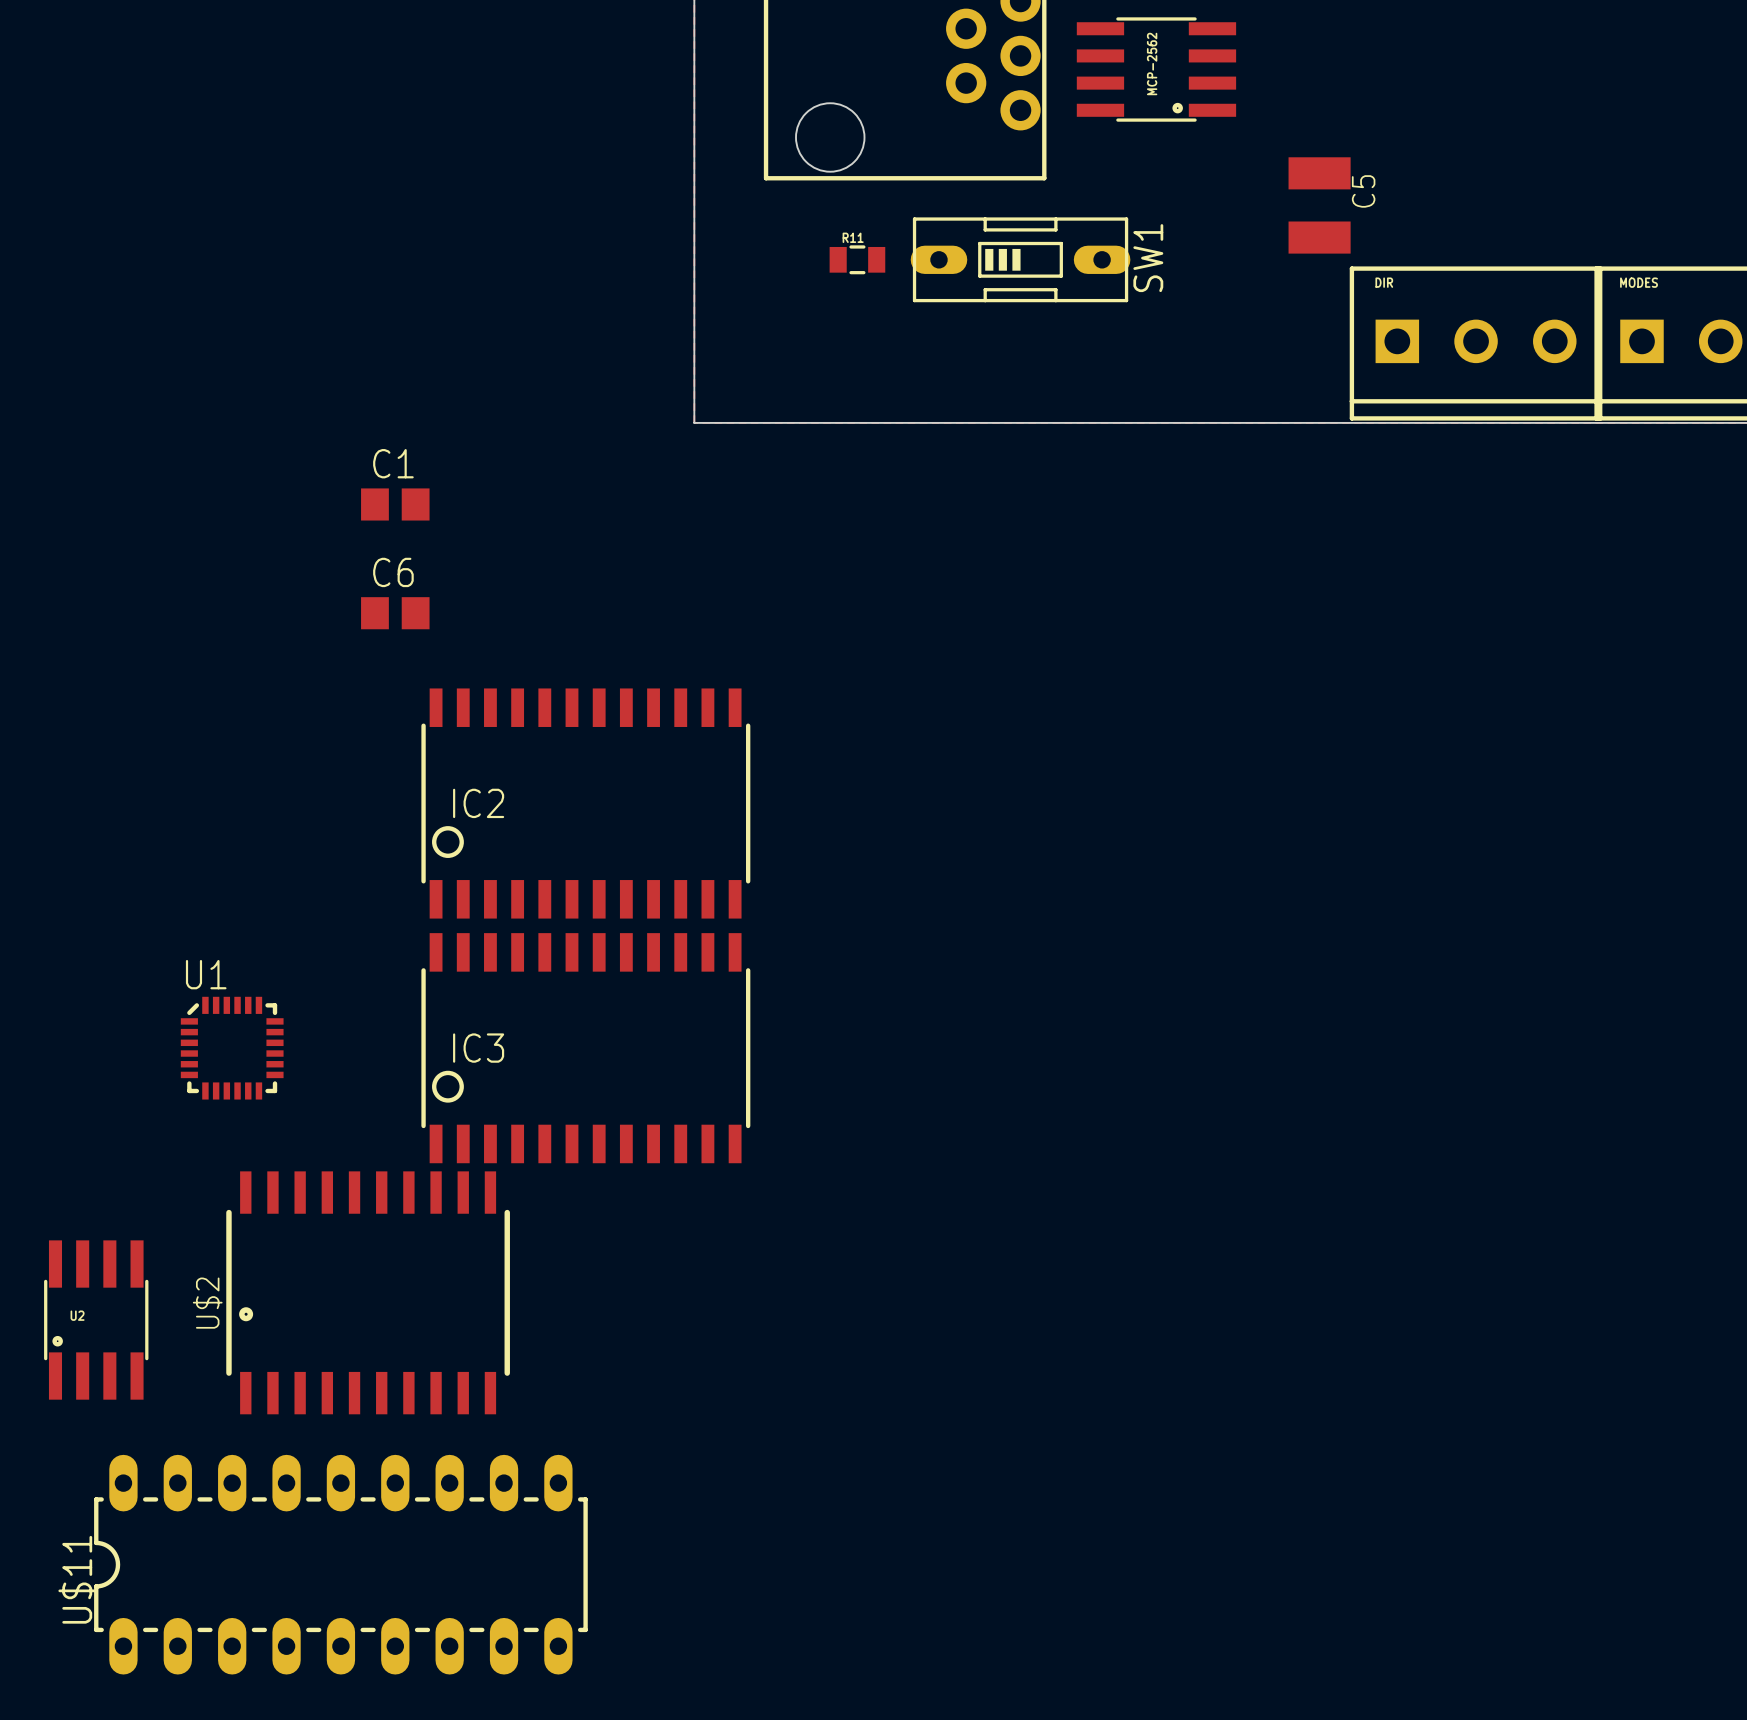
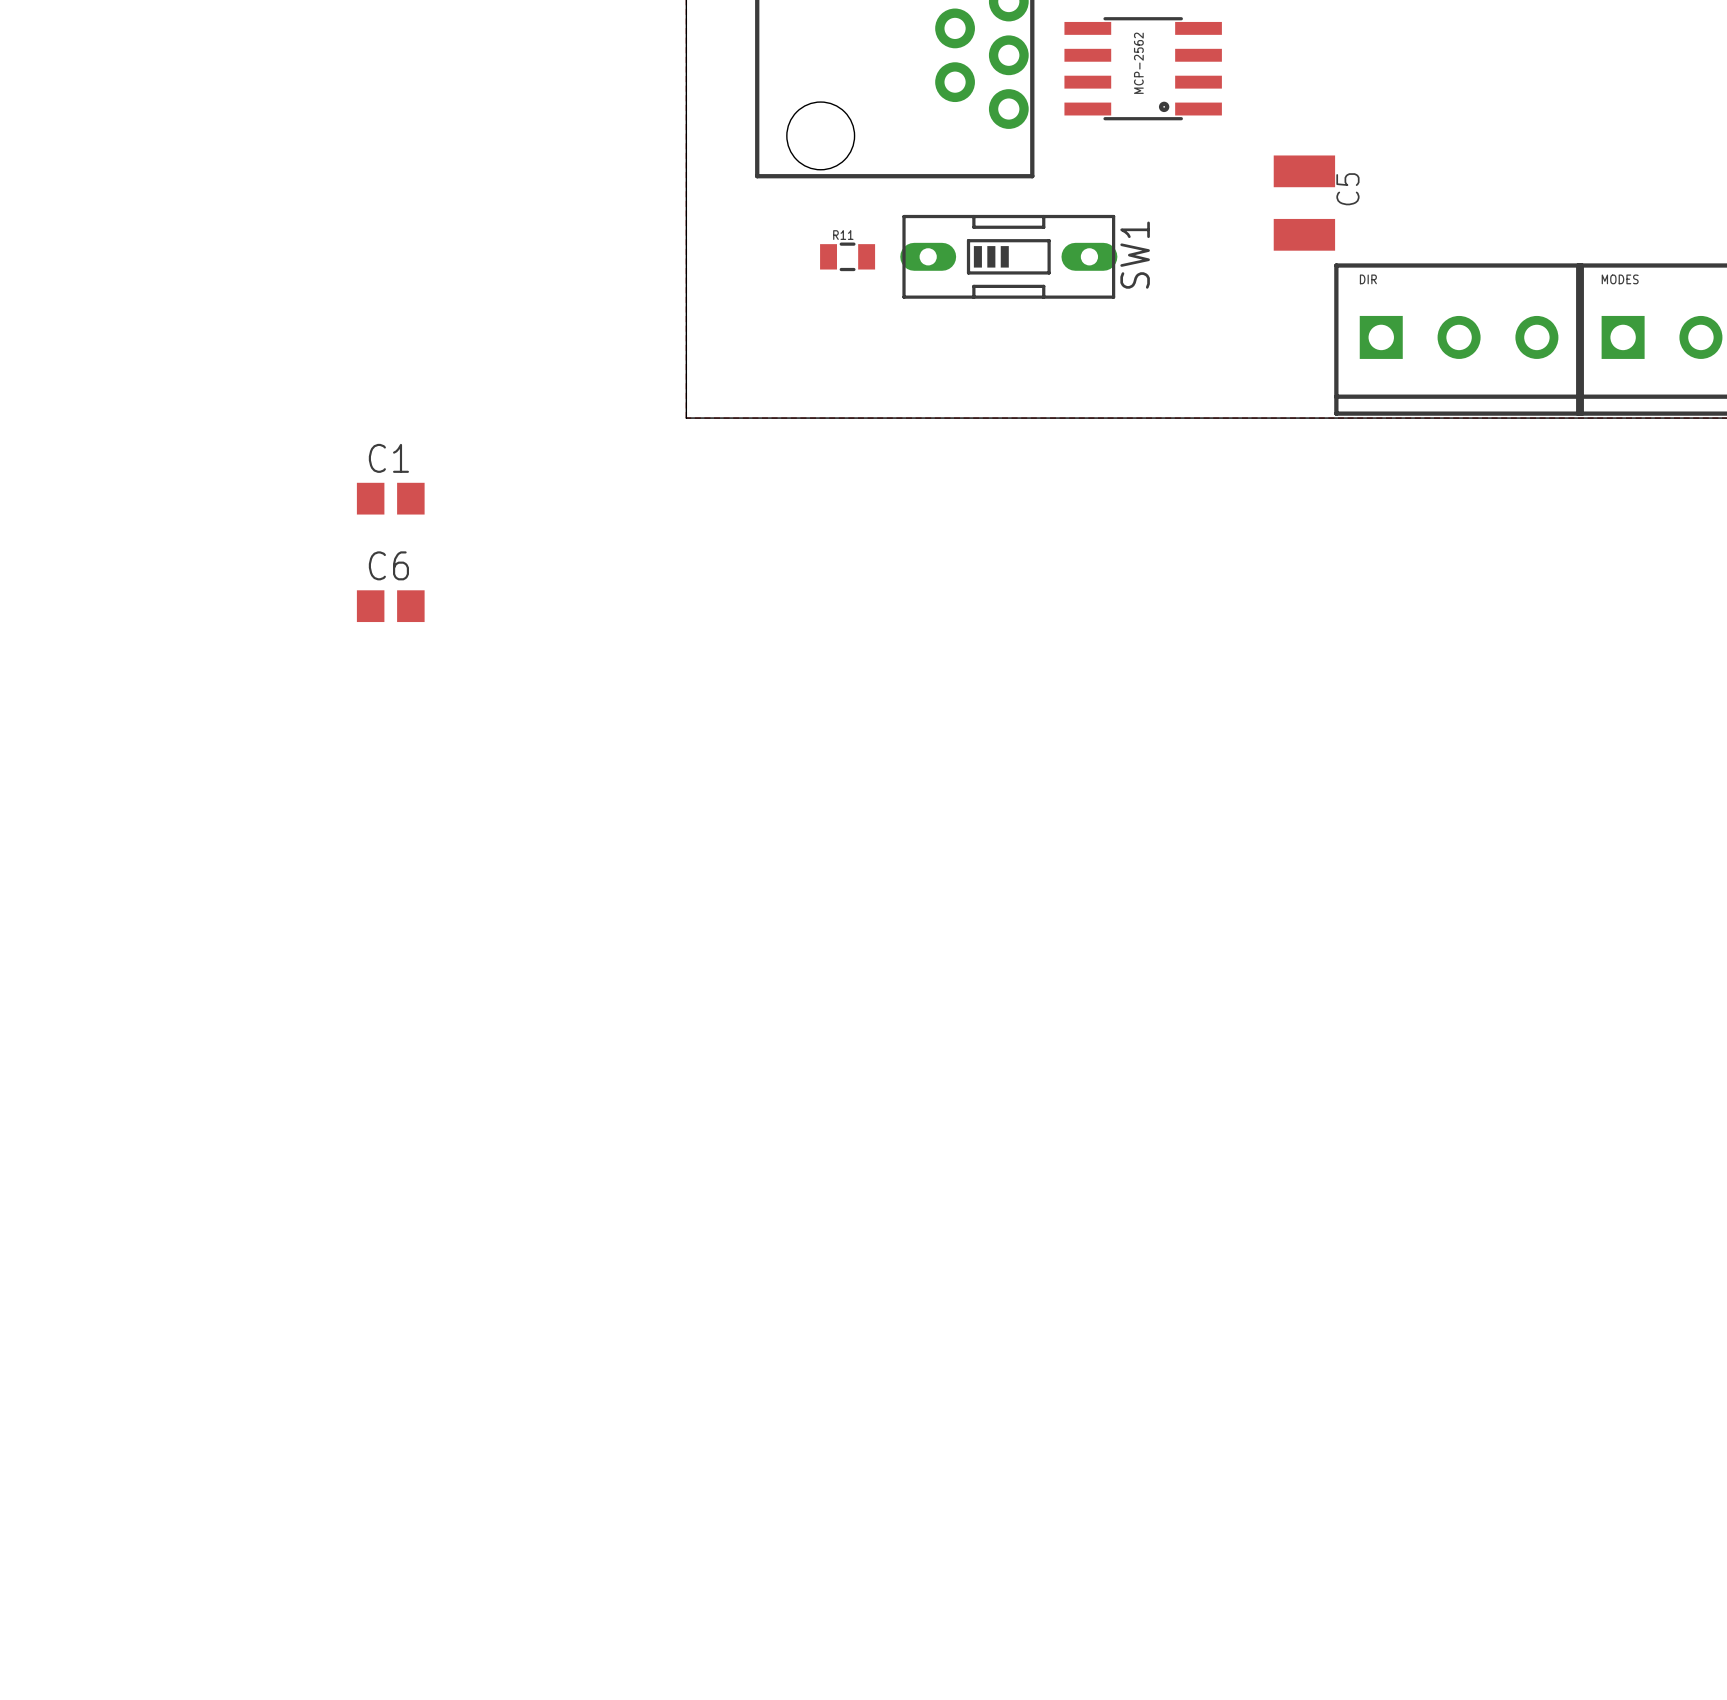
IC2: (585, 803) -> none
U1: (232, 1048) -> none
IC3: (585, 1048) -> none
U$2: (368, 1292) -> none
U2: (96, 1320) -> none
U$11: (340, 1564) -> none

